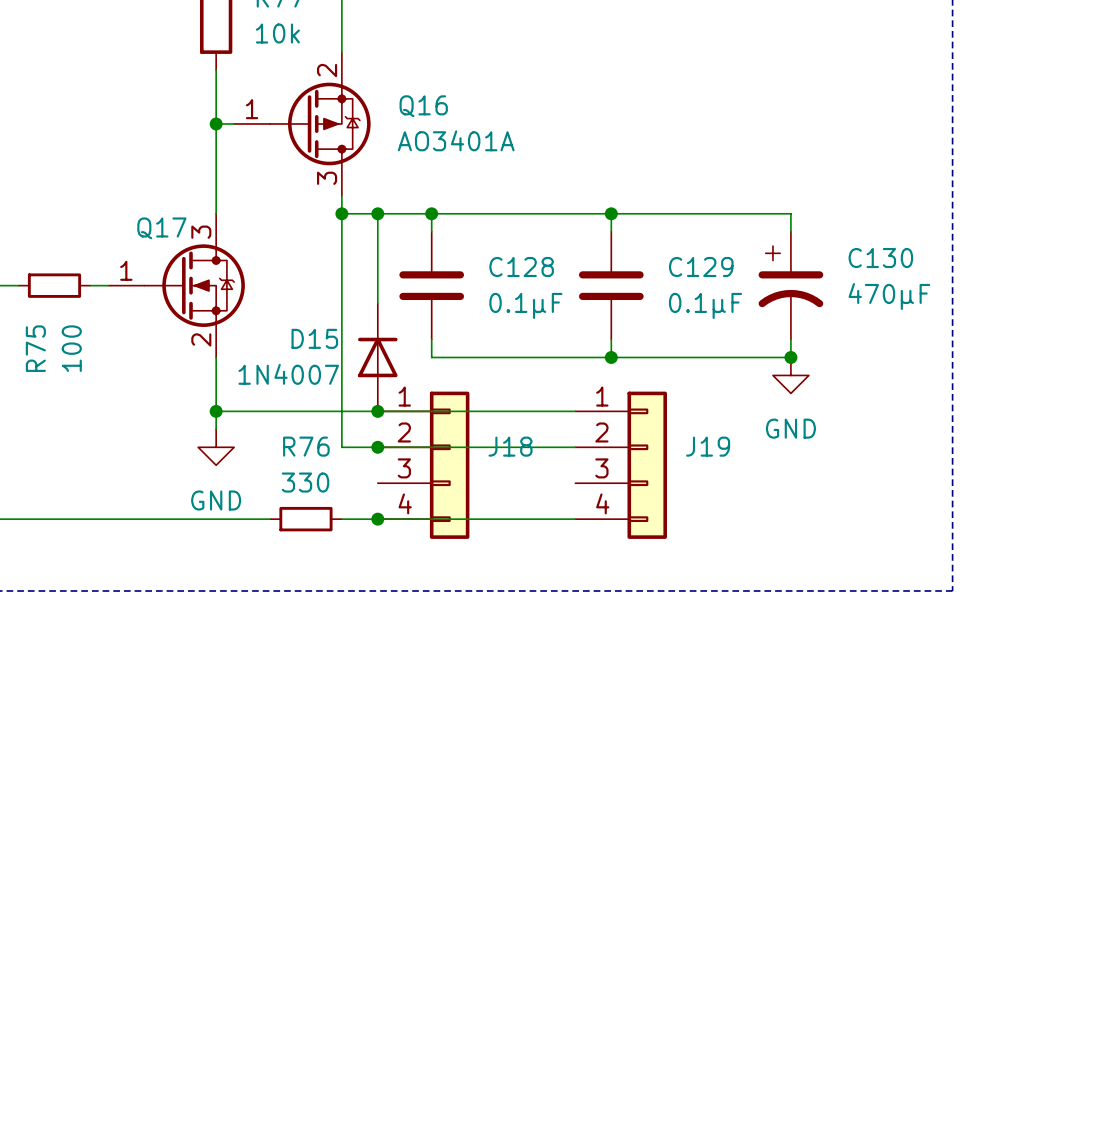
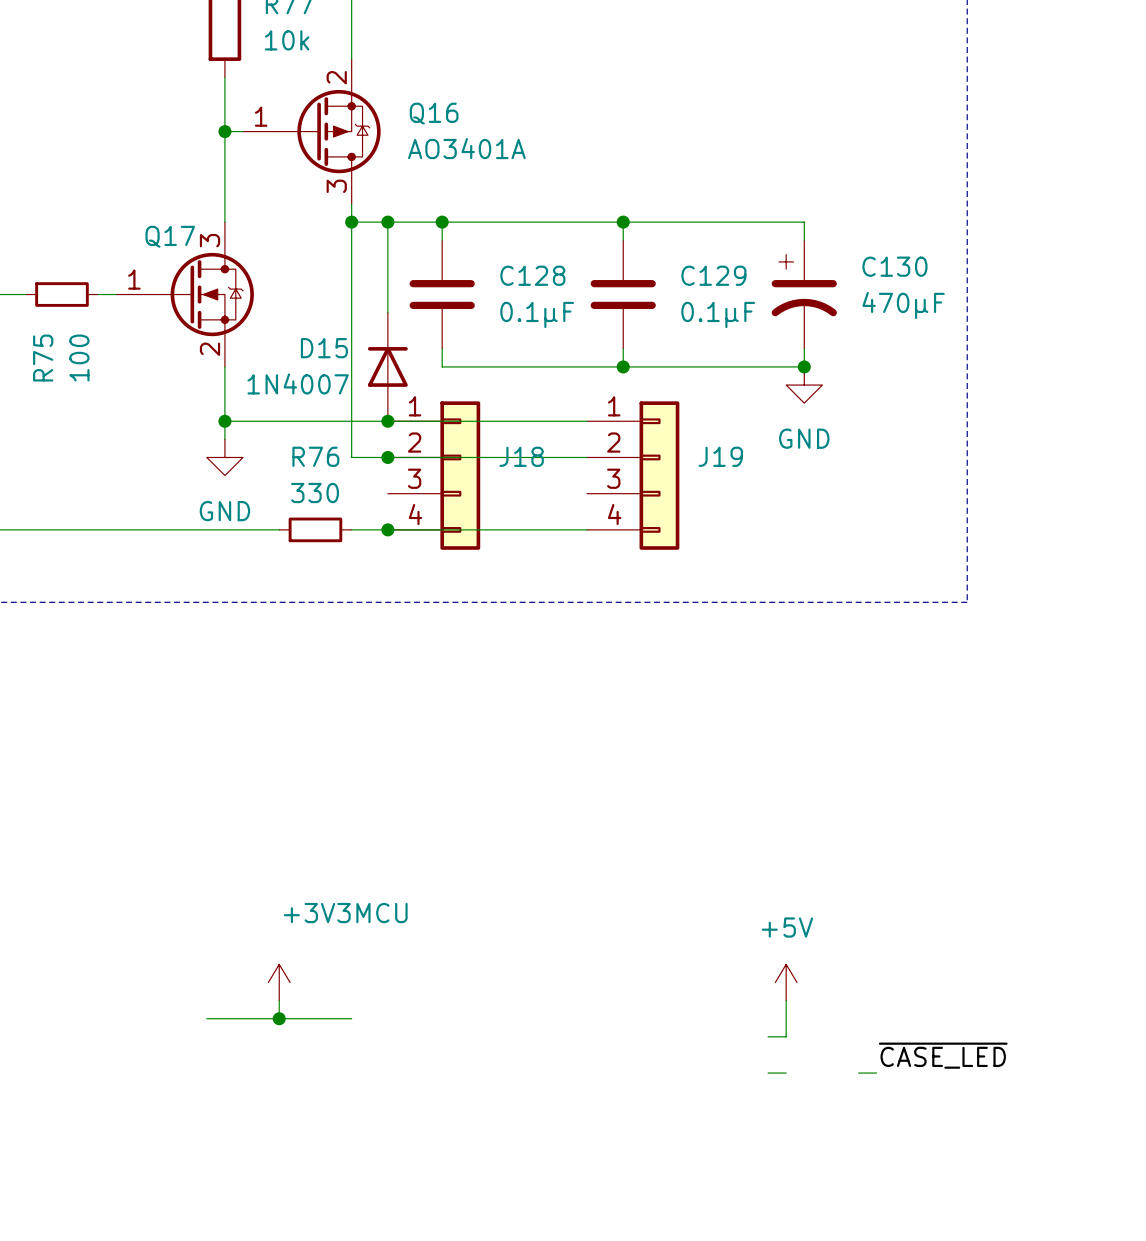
power symbol: none -> +3V3MCU (279, 982)
power symbol: none -> +5V (786, 982)
wire: none -> (279, 1000) (279, 1018)
wire: none -> (786, 1000) (786, 1036) (768, 1036)
wire: none -> (206, 1018) (351, 1018)
junction: none -> (279, 1018)
label: none -> ~{CASE_LED} (943, 1055)
wire: none -> (768, 1073) (786, 1073)
wire: none -> (858, 1073) (876, 1073)

